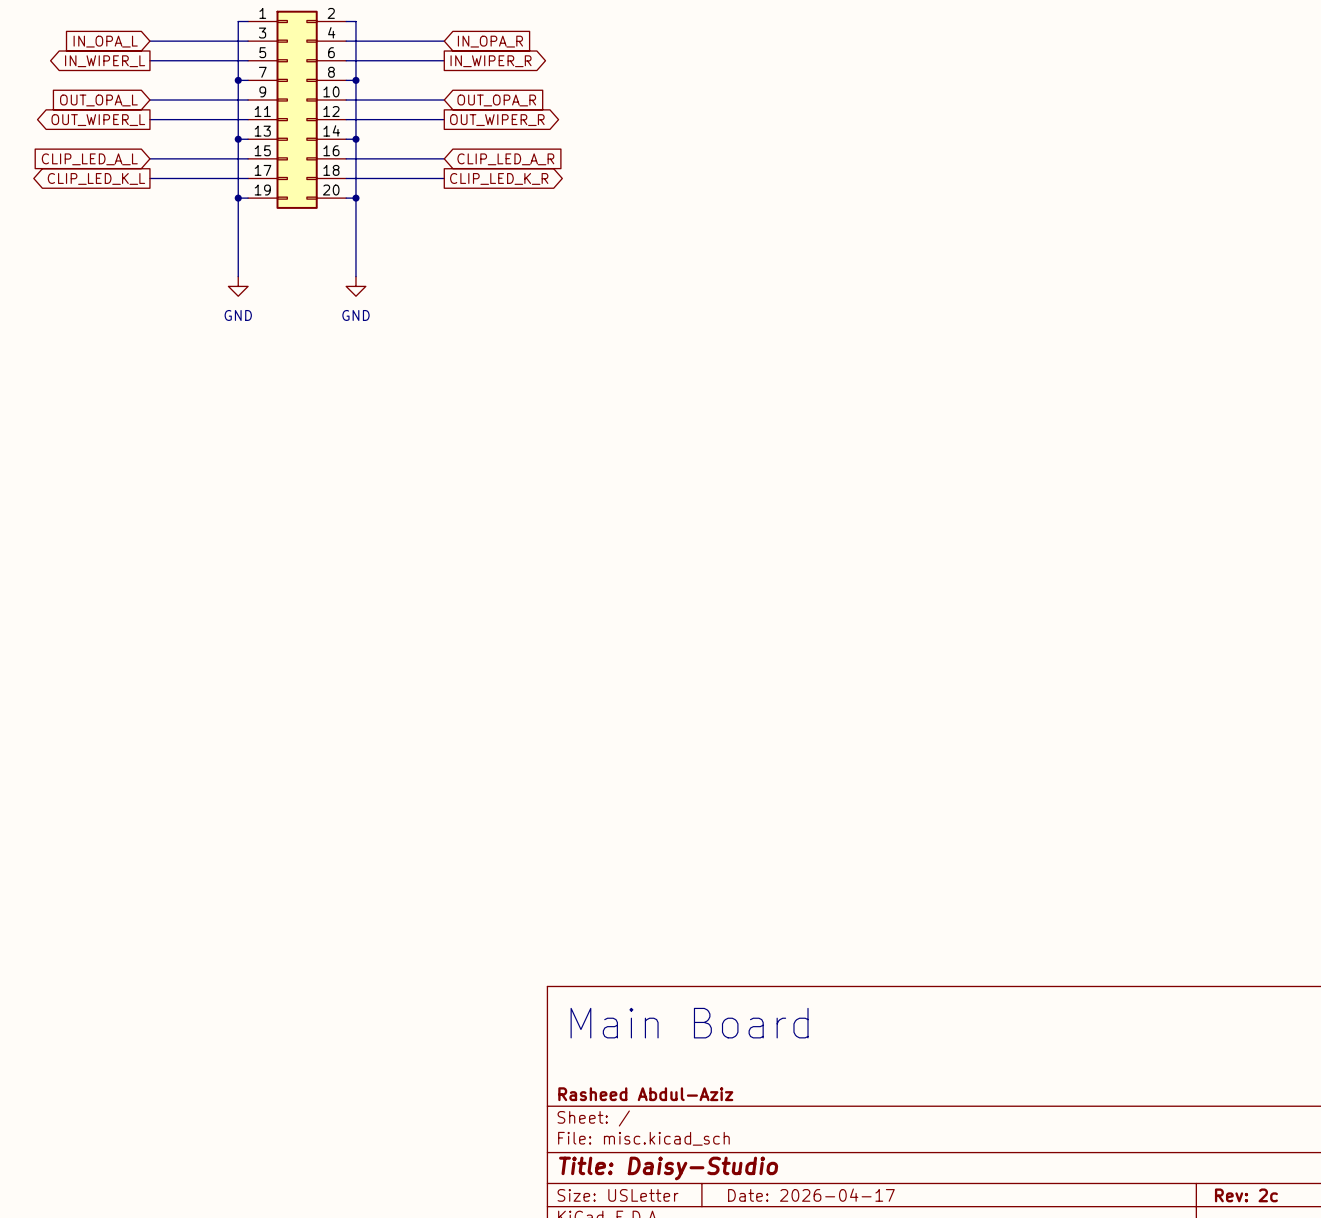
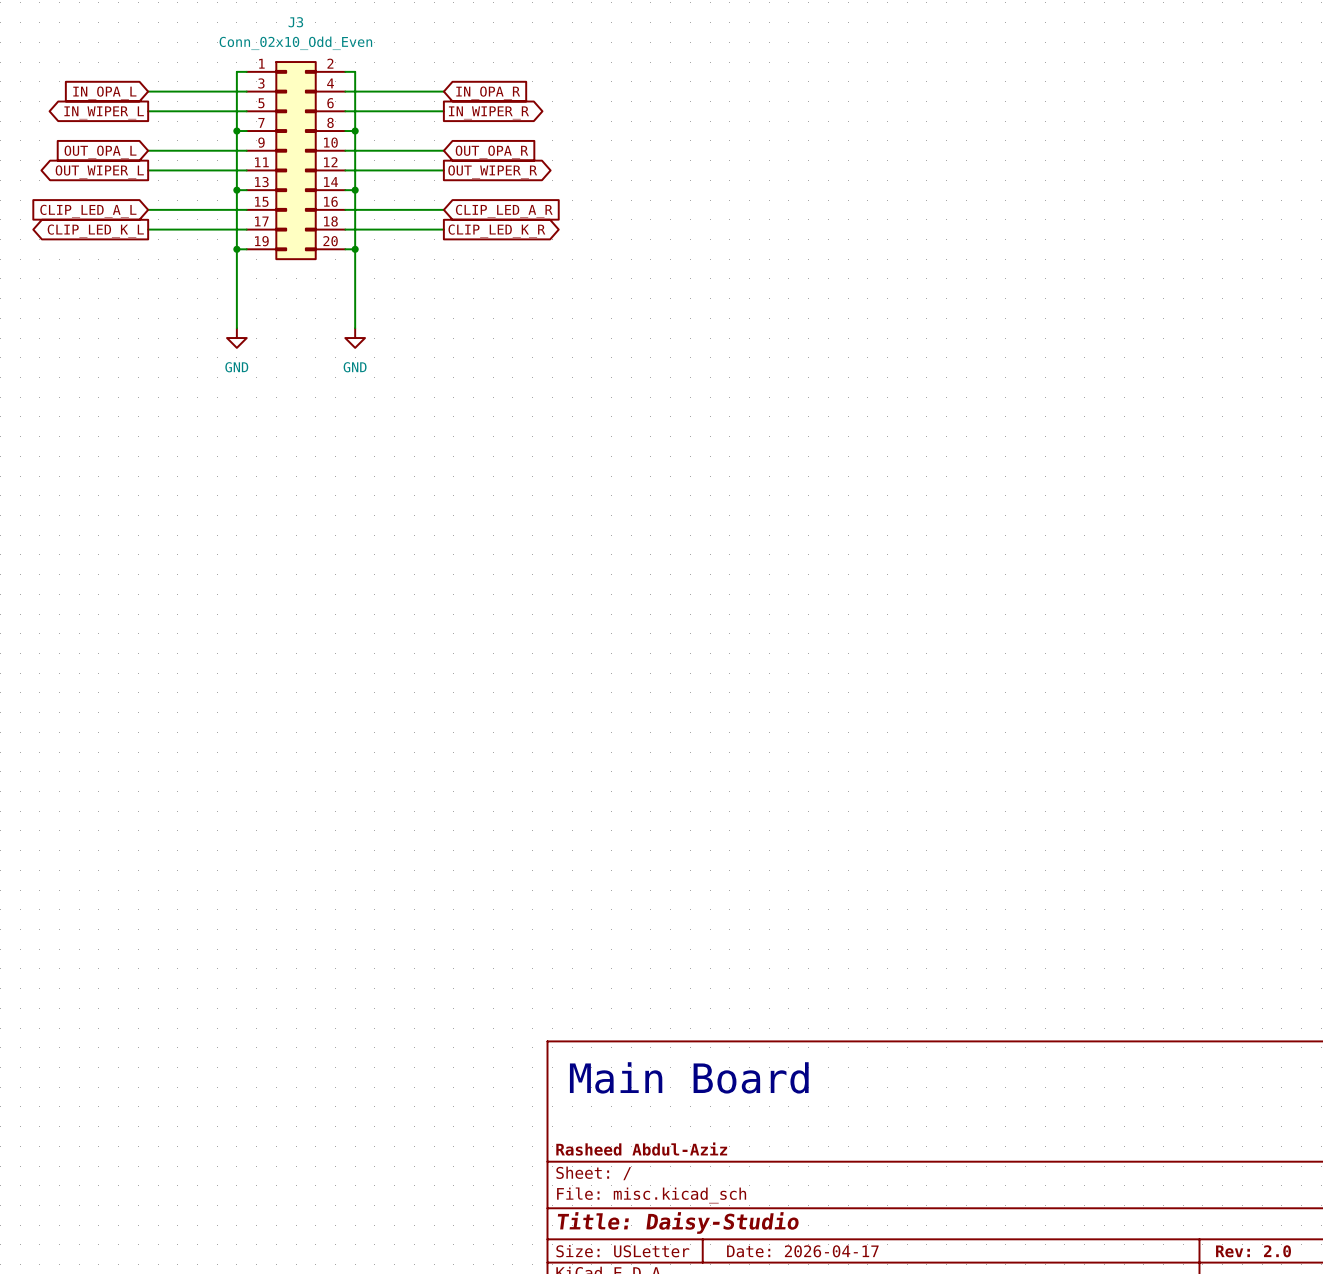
title block: Rev: 2c (1246, 1195) -> Rev: 2.0 (1253, 1251)

